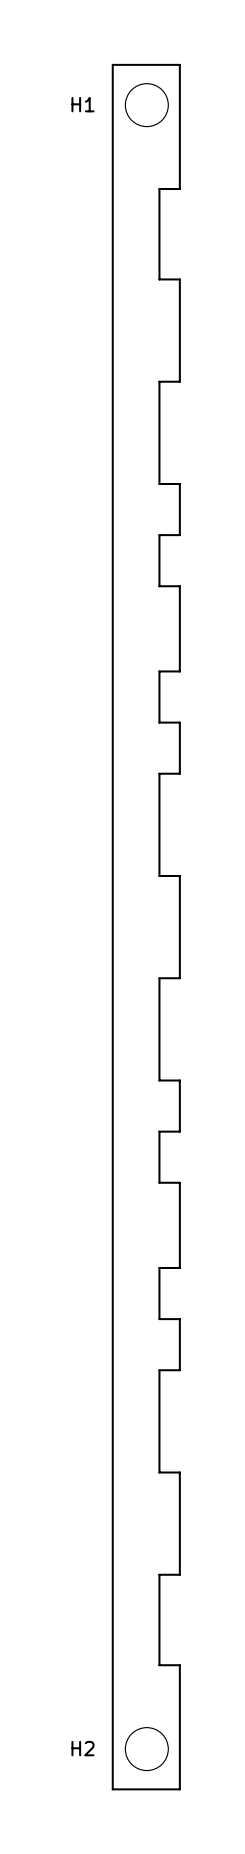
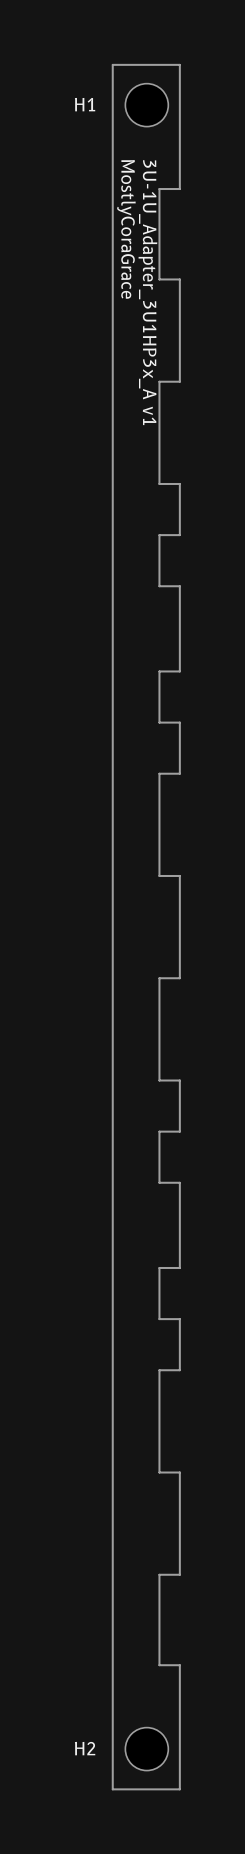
text: none -> MostlyCoraGrace (126, 229)
text: none -> 3U-1U_Adapter_3U1HP3x_A v1 (147, 292)

